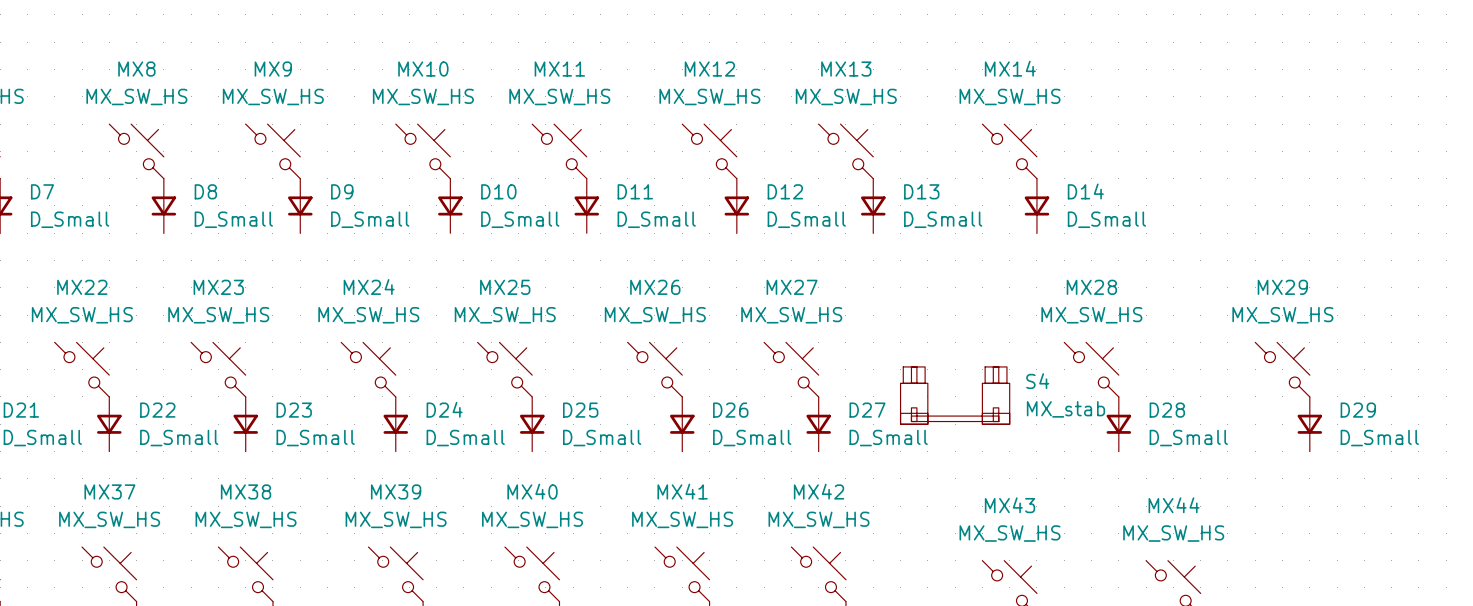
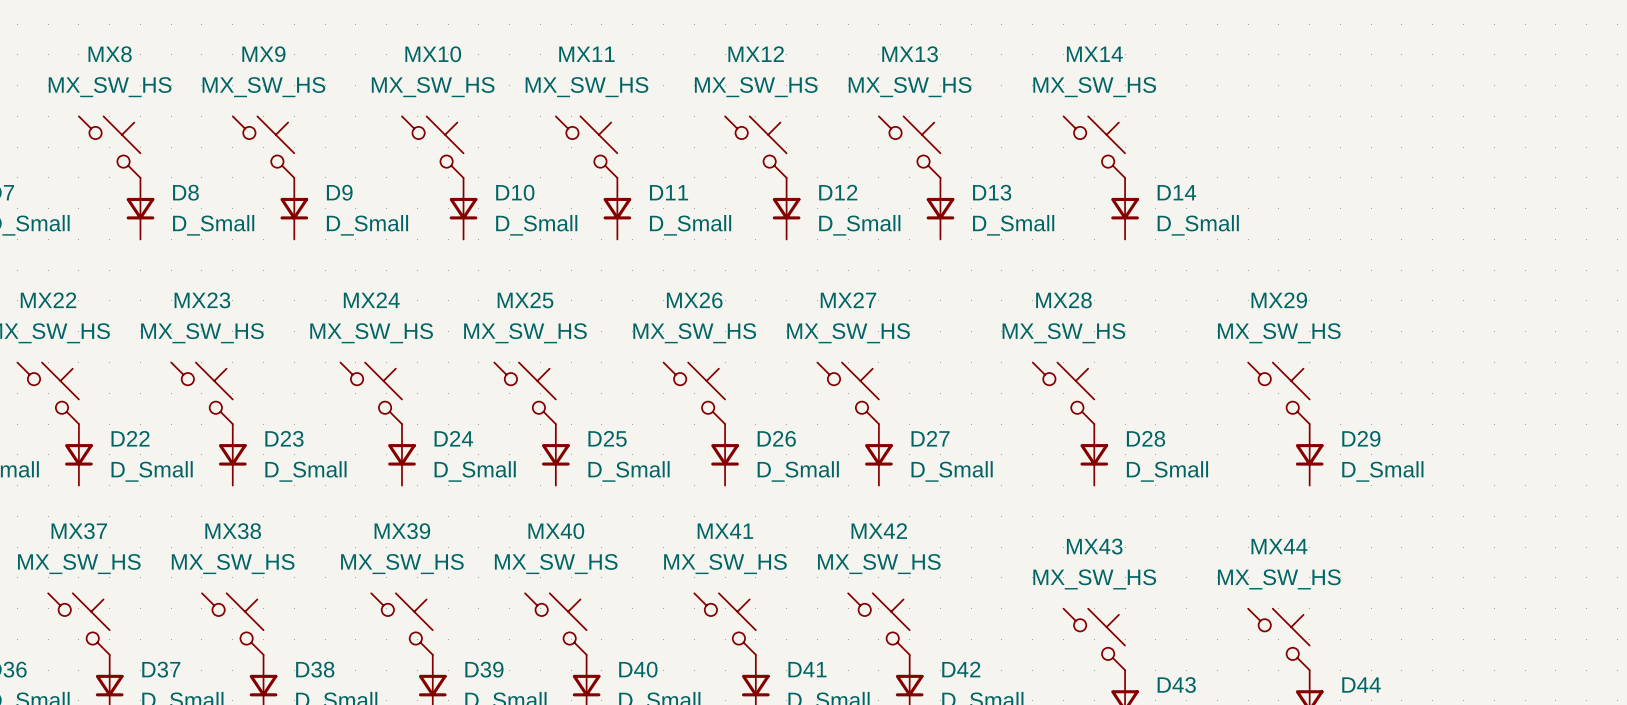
MX28 position: (1091, 369) -> (1063, 393)
MX29 position: (1282, 369) -> (1278, 393)
S4: MX_stab (955, 395) -> none
D28 position: (1118, 424) -> (1094, 454)
D29 position: (1309, 424) -> (1309, 454)

